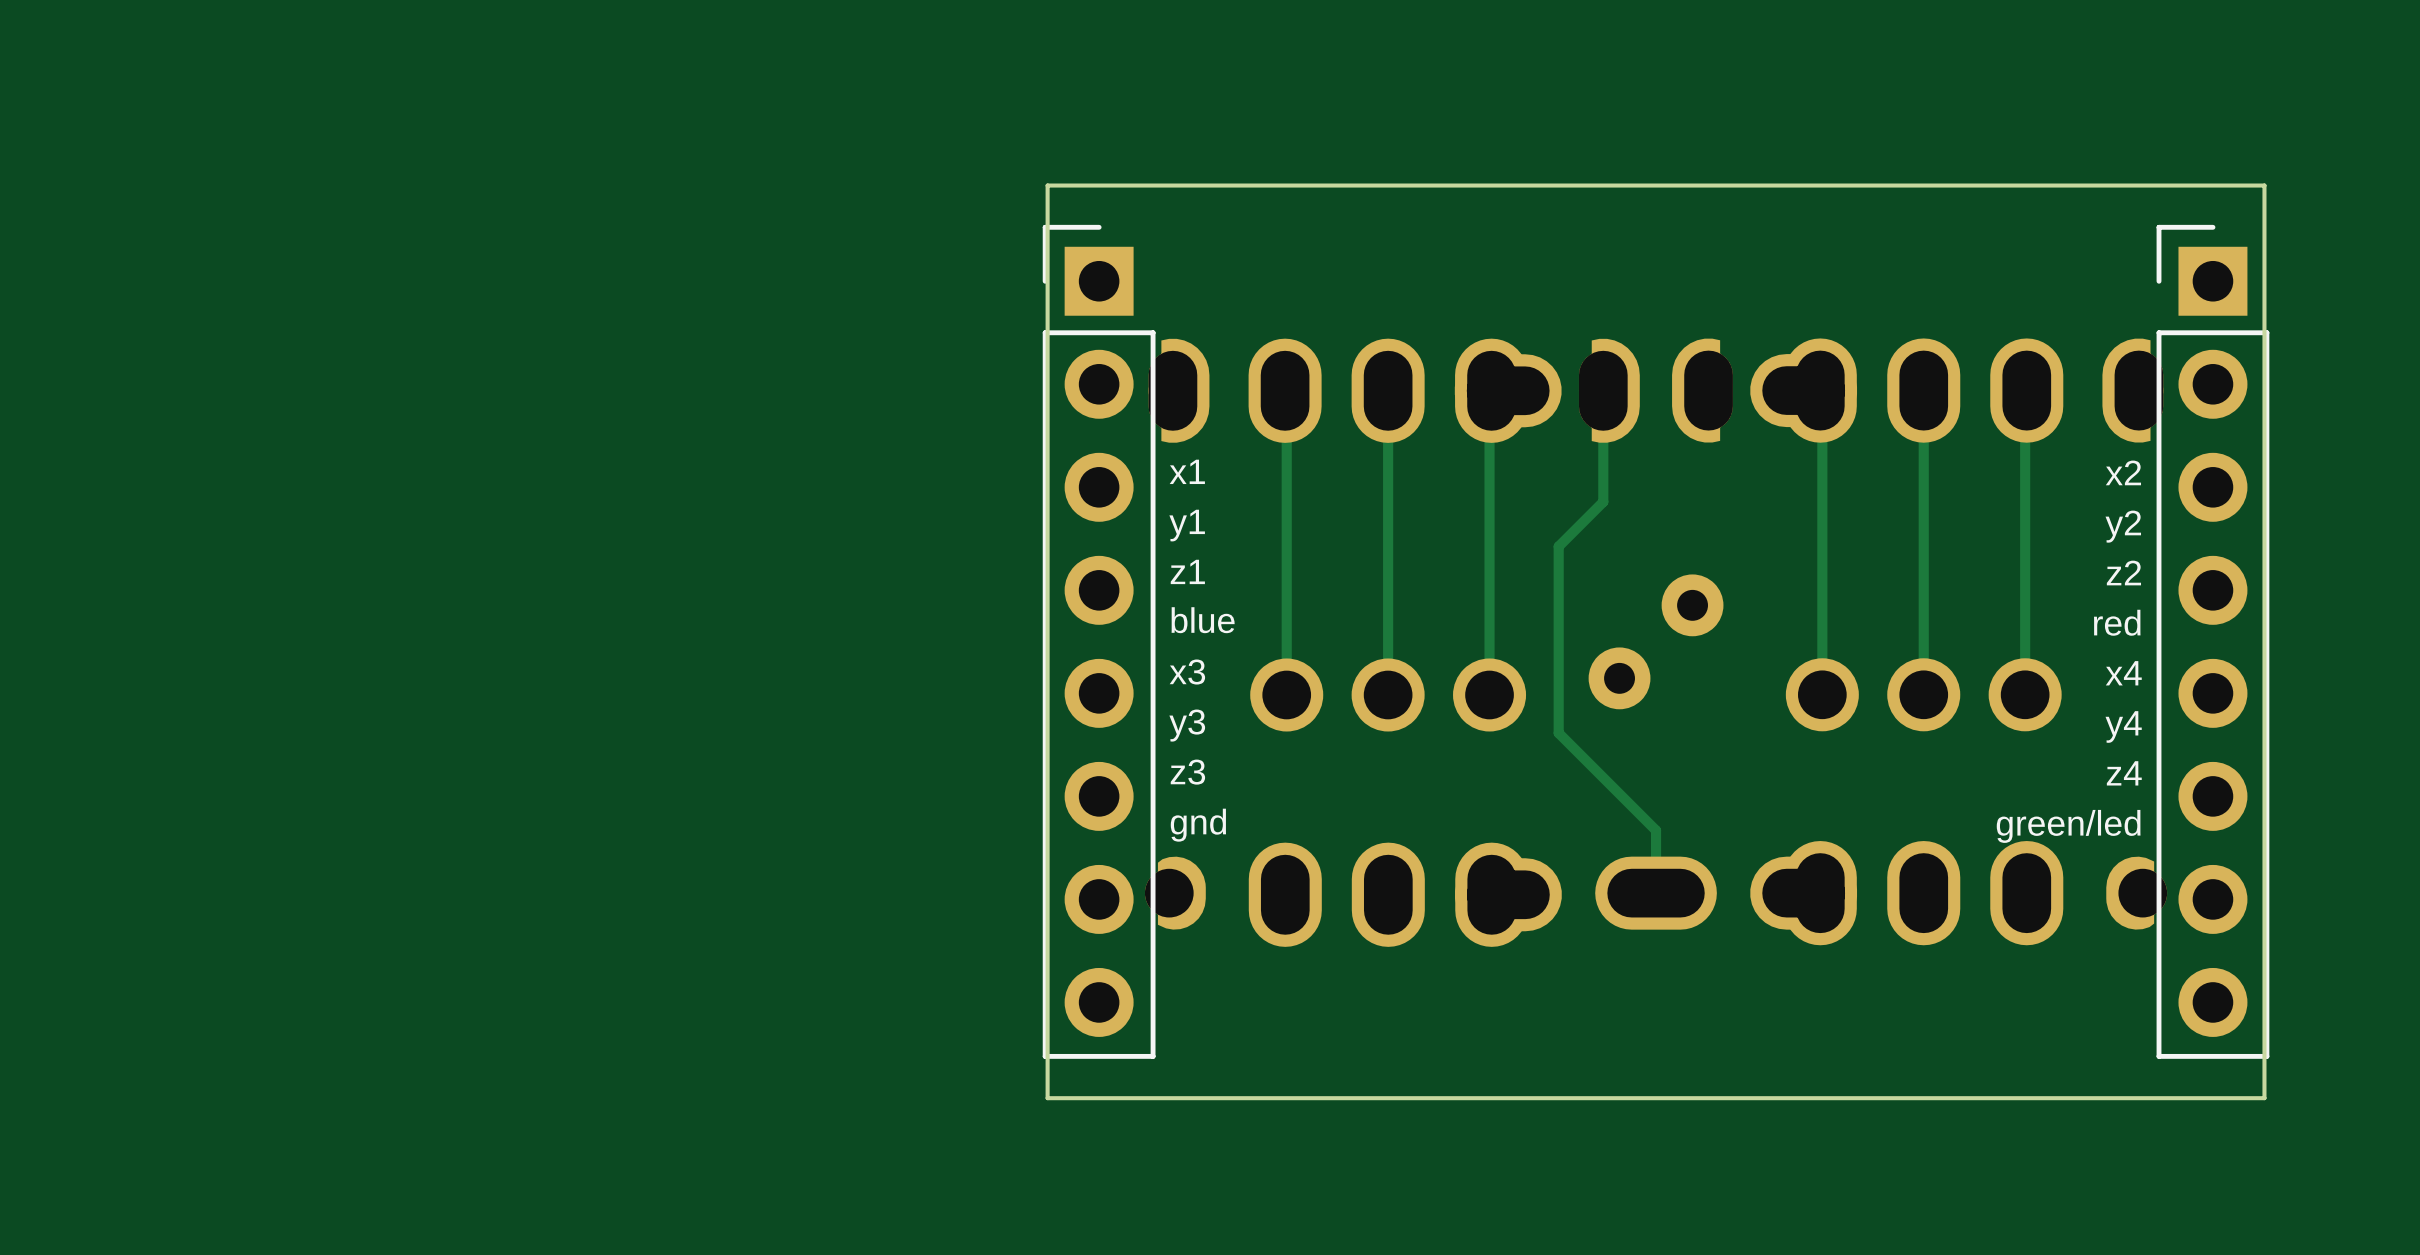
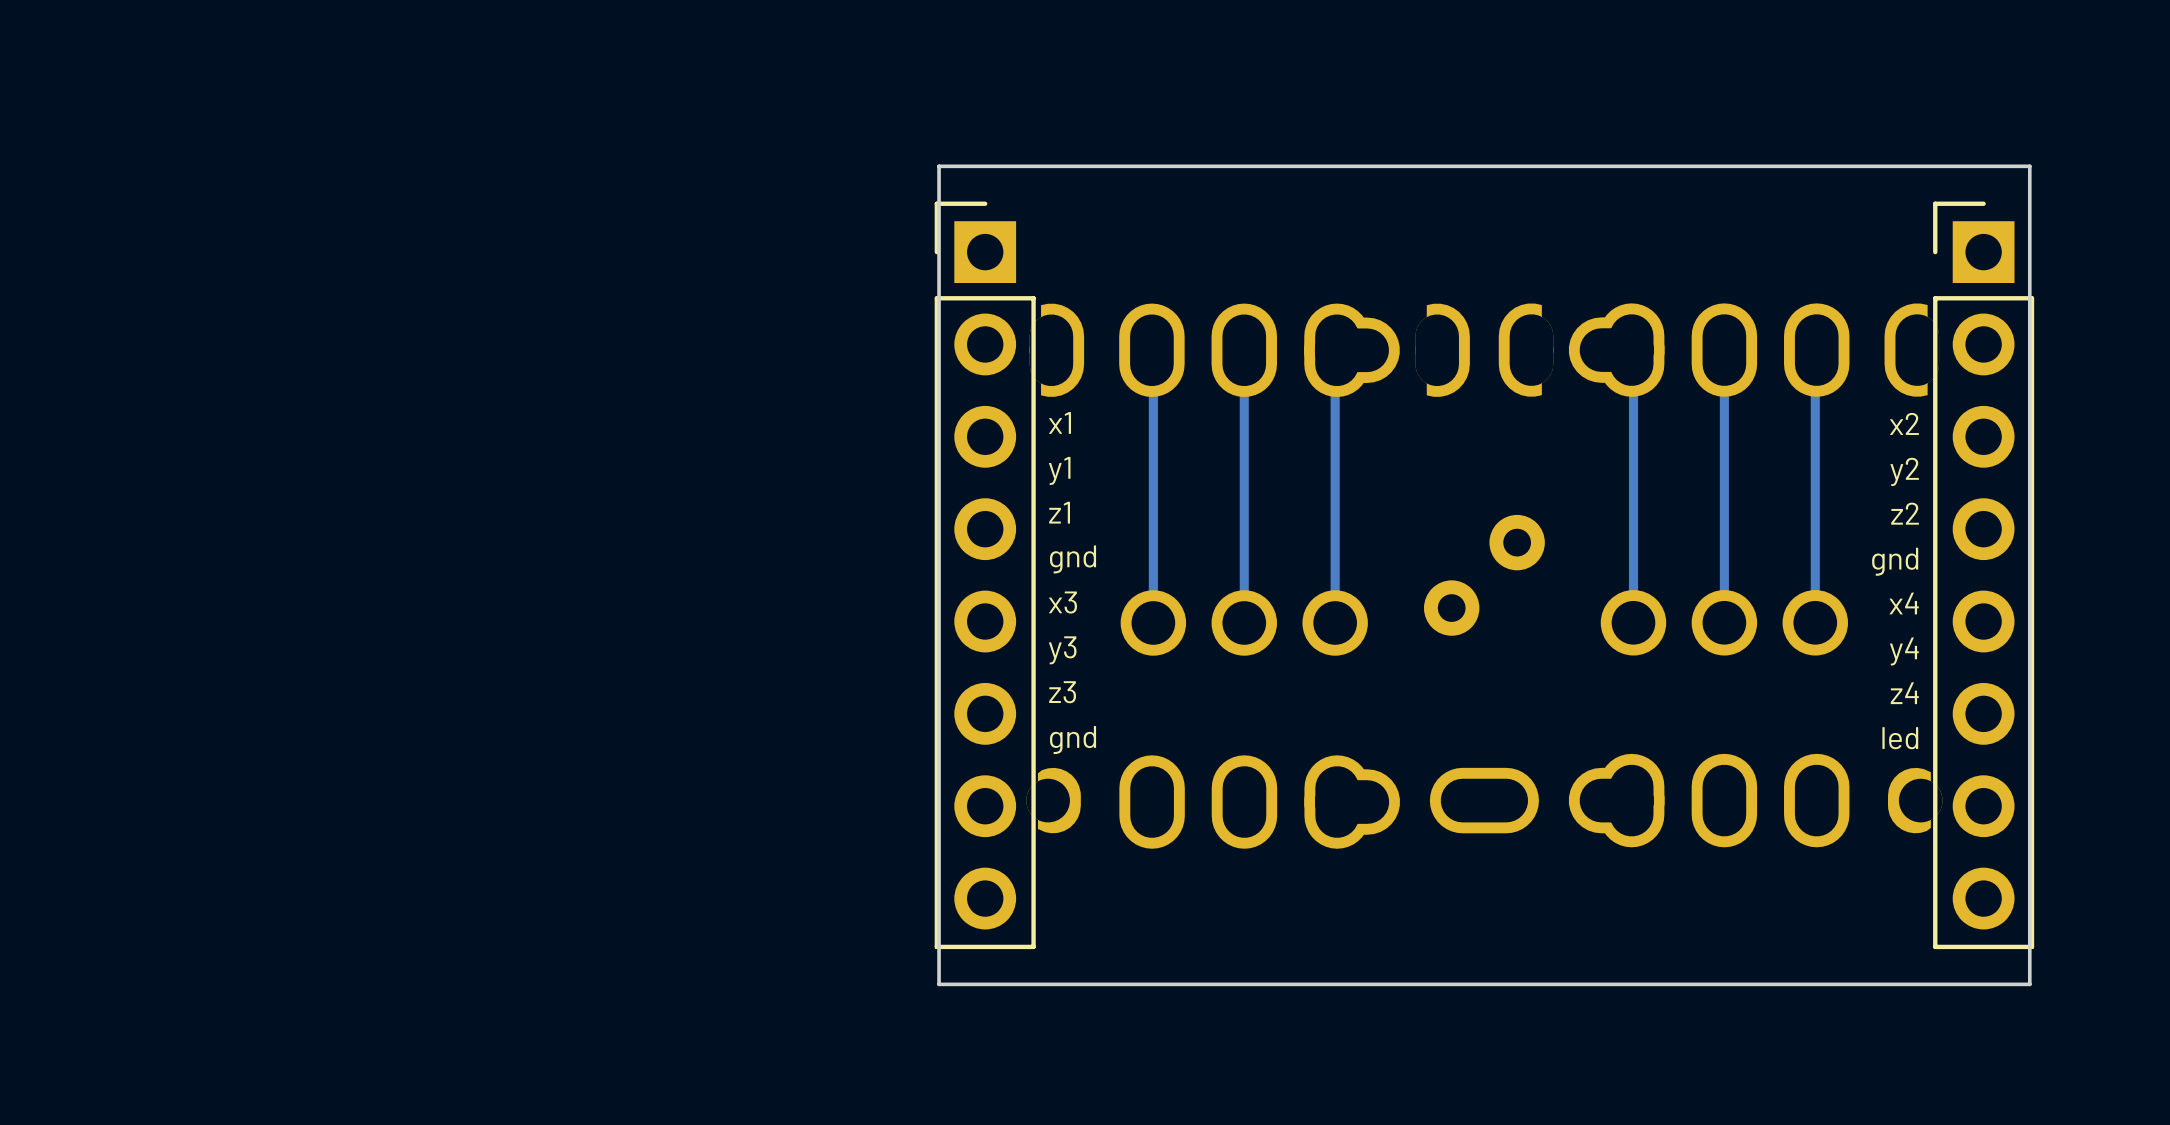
track: (1603, 390) (1603, 501) (1558, 546) (1558, 733) (1656, 830) (1656, 893) -> none
text: blue (1203, 620) -> gnd (1073, 559)
text: red (2117, 622) -> gnd (1895, 561)
text: green/led (2068, 826) -> led (1900, 738)

